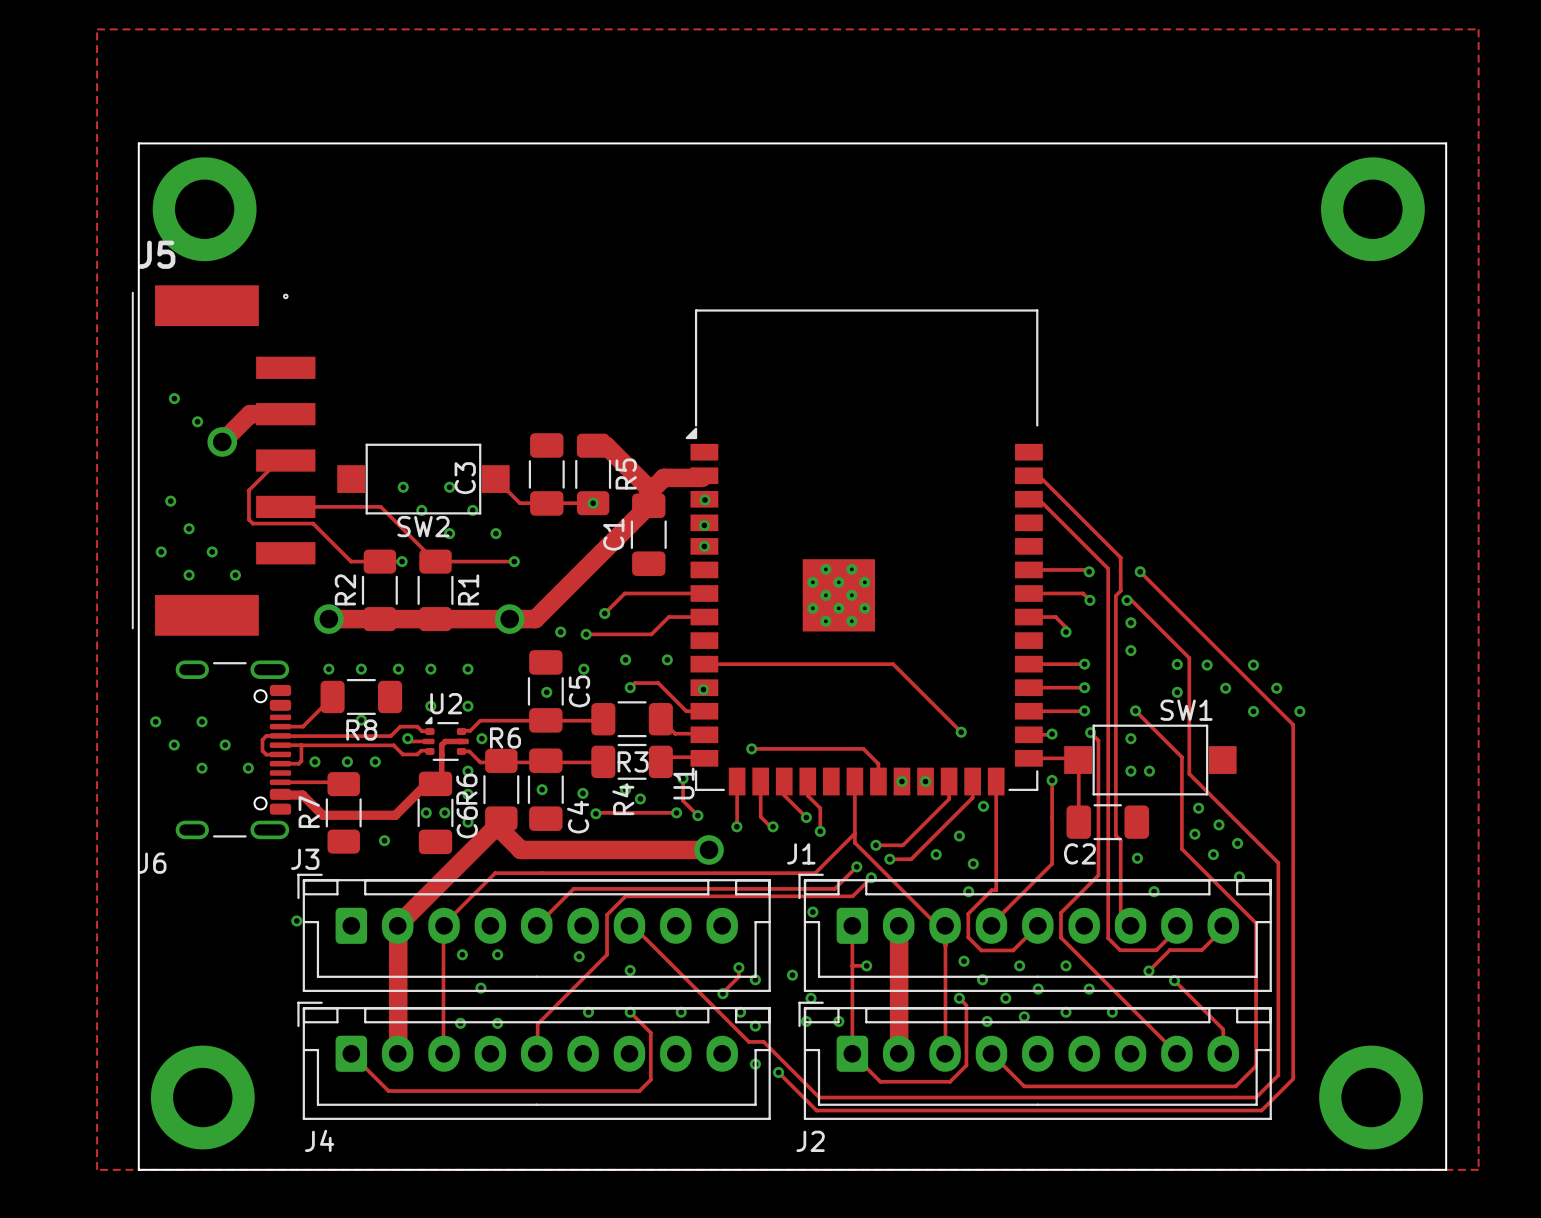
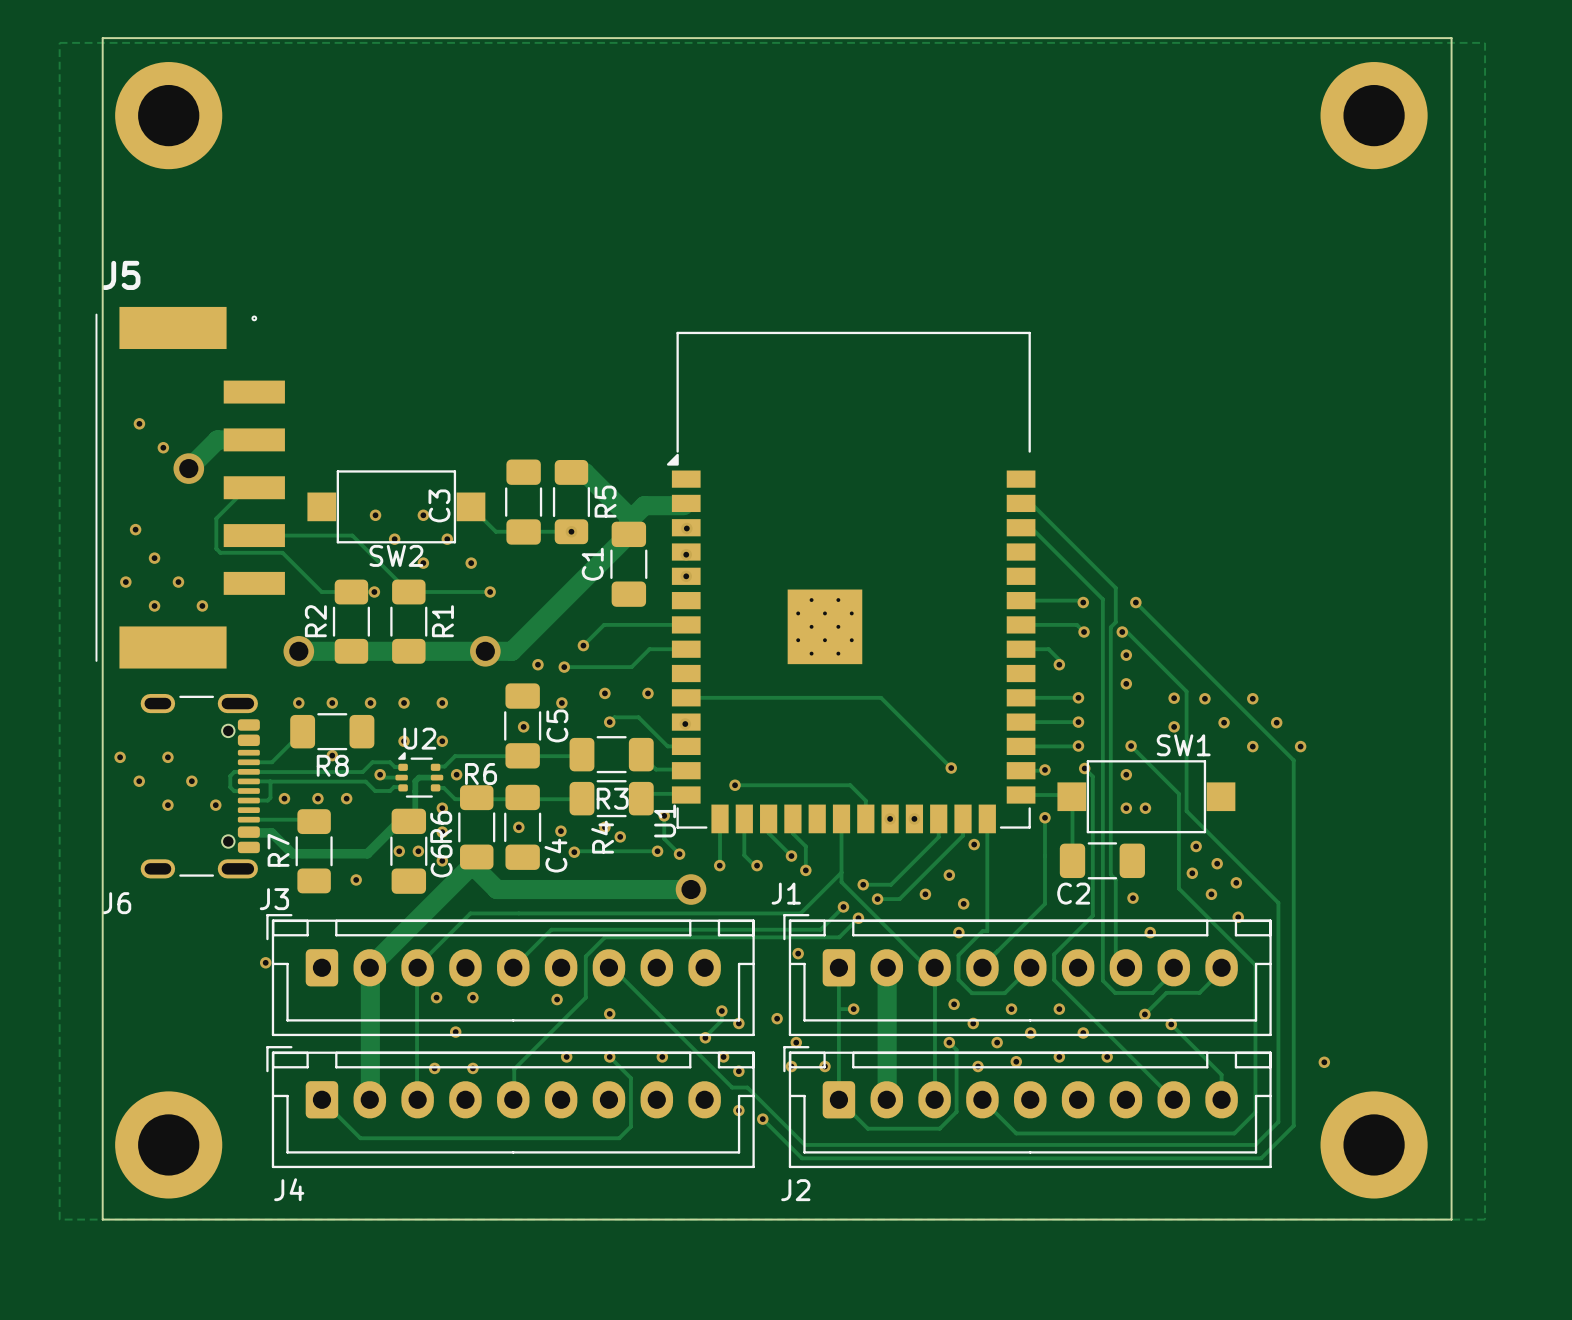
board edge: (138, 143) (1446, 143) -> (102, 160) (102, 38) (1451, 38) (1451, 160)
part position: (204, 209) -> (168, 115)
part position: (1372, 209) -> (1374, 115)
via: none -> (1324, 1062)

